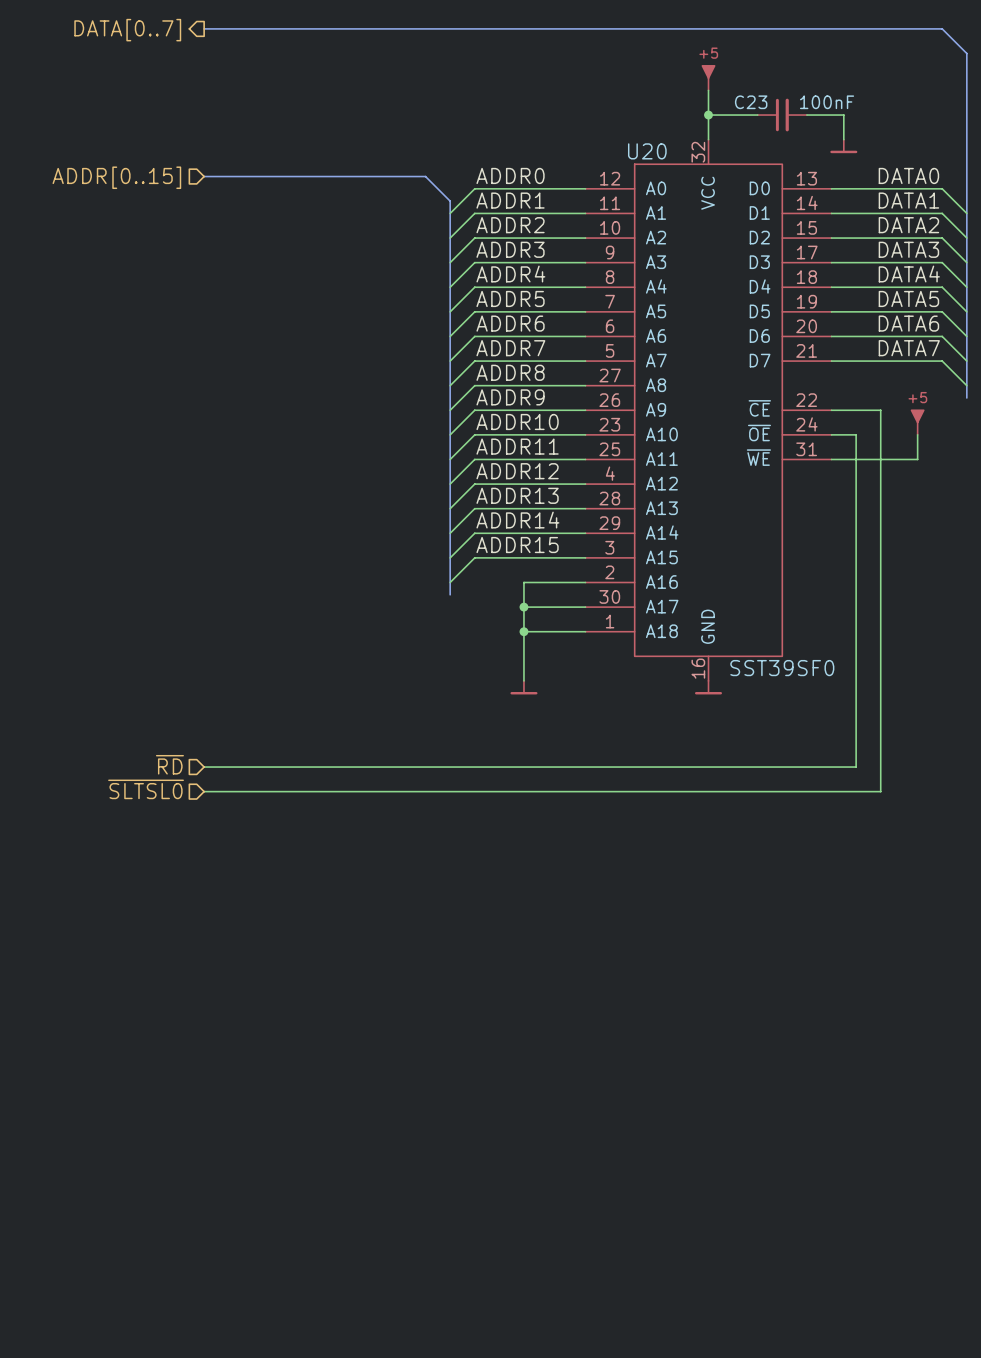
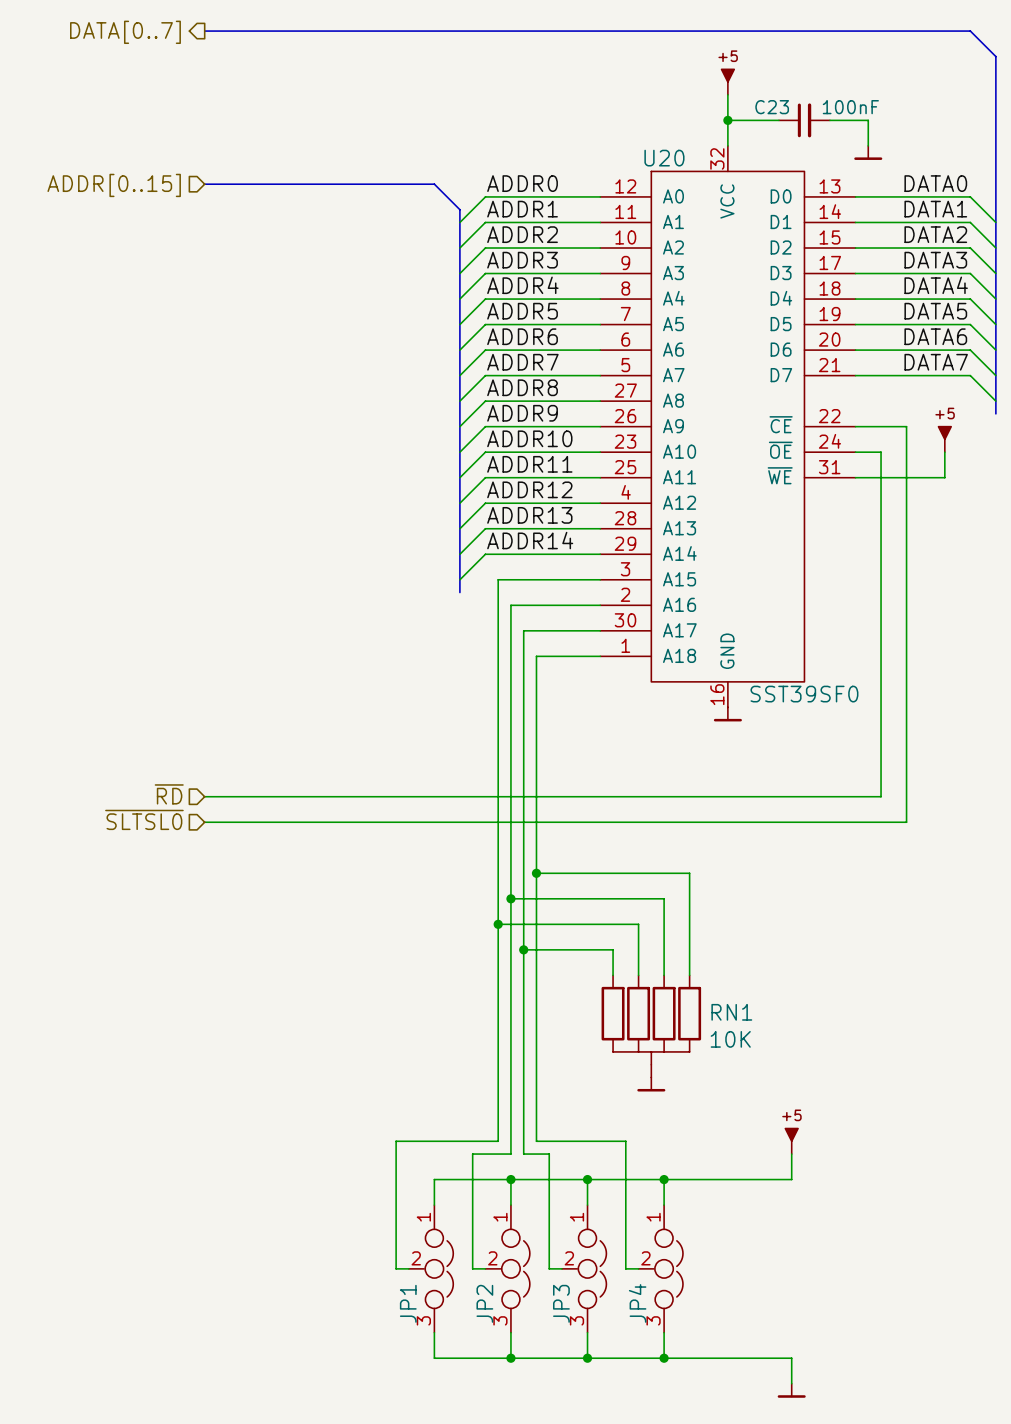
label: ADDR15 (517, 545) -> none
wire: (487, 557) (474, 557) (450, 582) -> (498, 579) (498, 1141) (396, 1141) (396, 1268) (408, 1268)
bus: (450, 570) (450, 594) -> none
wire: (523, 582) (523, 631) -> (536, 605) (510, 605) (510, 1154) (472, 1154) (472, 1268) (485, 1268)
wire: none -> (536, 630) (523, 630) (523, 1154) (549, 1154) (549, 1268) (562, 1268)
junction: (523, 607) -> none
junction: (523, 631) -> none
wire: none -> (536, 707) (536, 1141) (625, 1141) (625, 1268) (638, 1268)
power symbol: (523, 687) -> none
wire: none -> (536, 873) (689, 873) (689, 975)
junction: none -> (536, 873)
wire: none -> (510, 898) (664, 898) (664, 975)
junction: none -> (510, 898)
wire: none -> (498, 924) (638, 924) (638, 975)
junction: none -> (498, 924)
wire: none -> (523, 949) (613, 949) (613, 975)
junction: none -> (523, 949)
RN1: none -> 10K (651, 1026)
power symbol: none -> (651, 1084)
power symbol: none -> (791, 1141)
wire: none -> (791, 1154) (791, 1179) (434, 1179) (434, 1205)
wire: none -> (510, 1179) (510, 1205)
junction: none -> (510, 1179)
wire: none -> (587, 1179) (587, 1205)
junction: none -> (587, 1179)
wire: none -> (664, 1179) (664, 1205)
junction: none -> (664, 1179)
JP1: none -> (431, 1268)
JP2: none -> (507, 1268)
JP3: none -> (584, 1268)
JP4: none -> (660, 1268)
wire: none -> (434, 1332) (434, 1358) (791, 1358) (791, 1383)
wire: none -> (510, 1332) (510, 1358)
wire: none -> (587, 1332) (587, 1358)
wire: none -> (664, 1332) (664, 1358)
junction: none -> (510, 1358)
junction: none -> (587, 1358)
junction: none -> (664, 1358)
power symbol: none -> (791, 1390)

